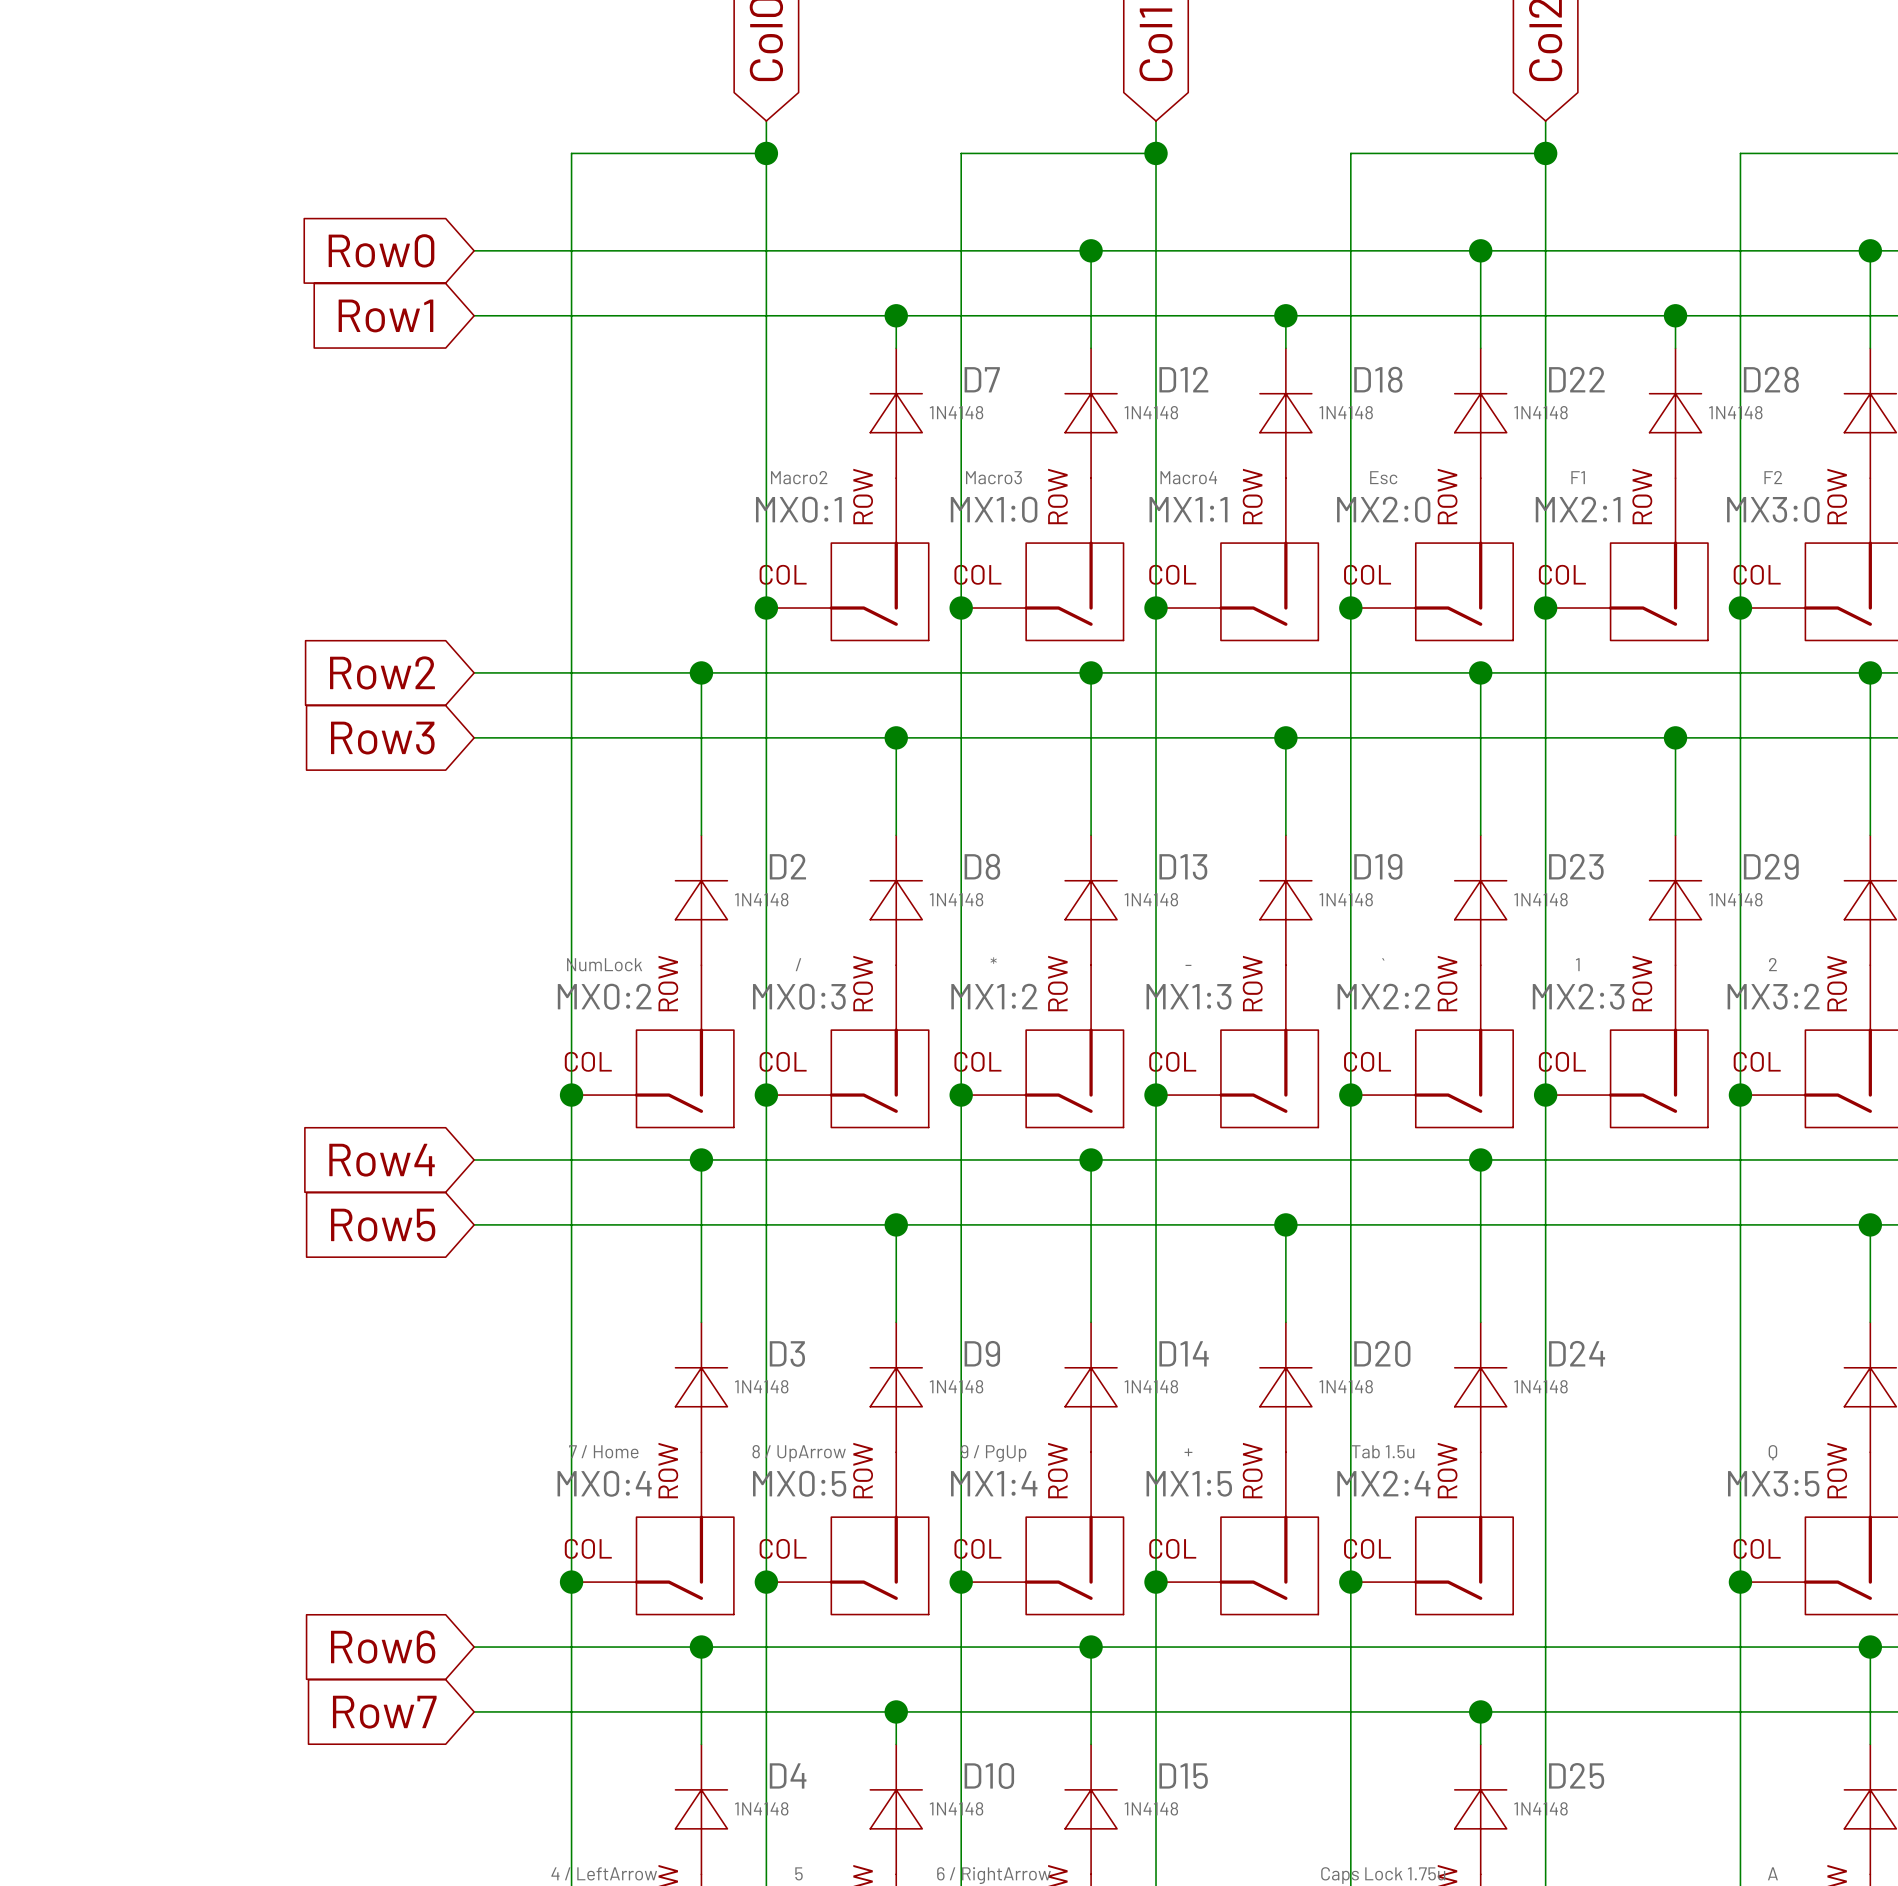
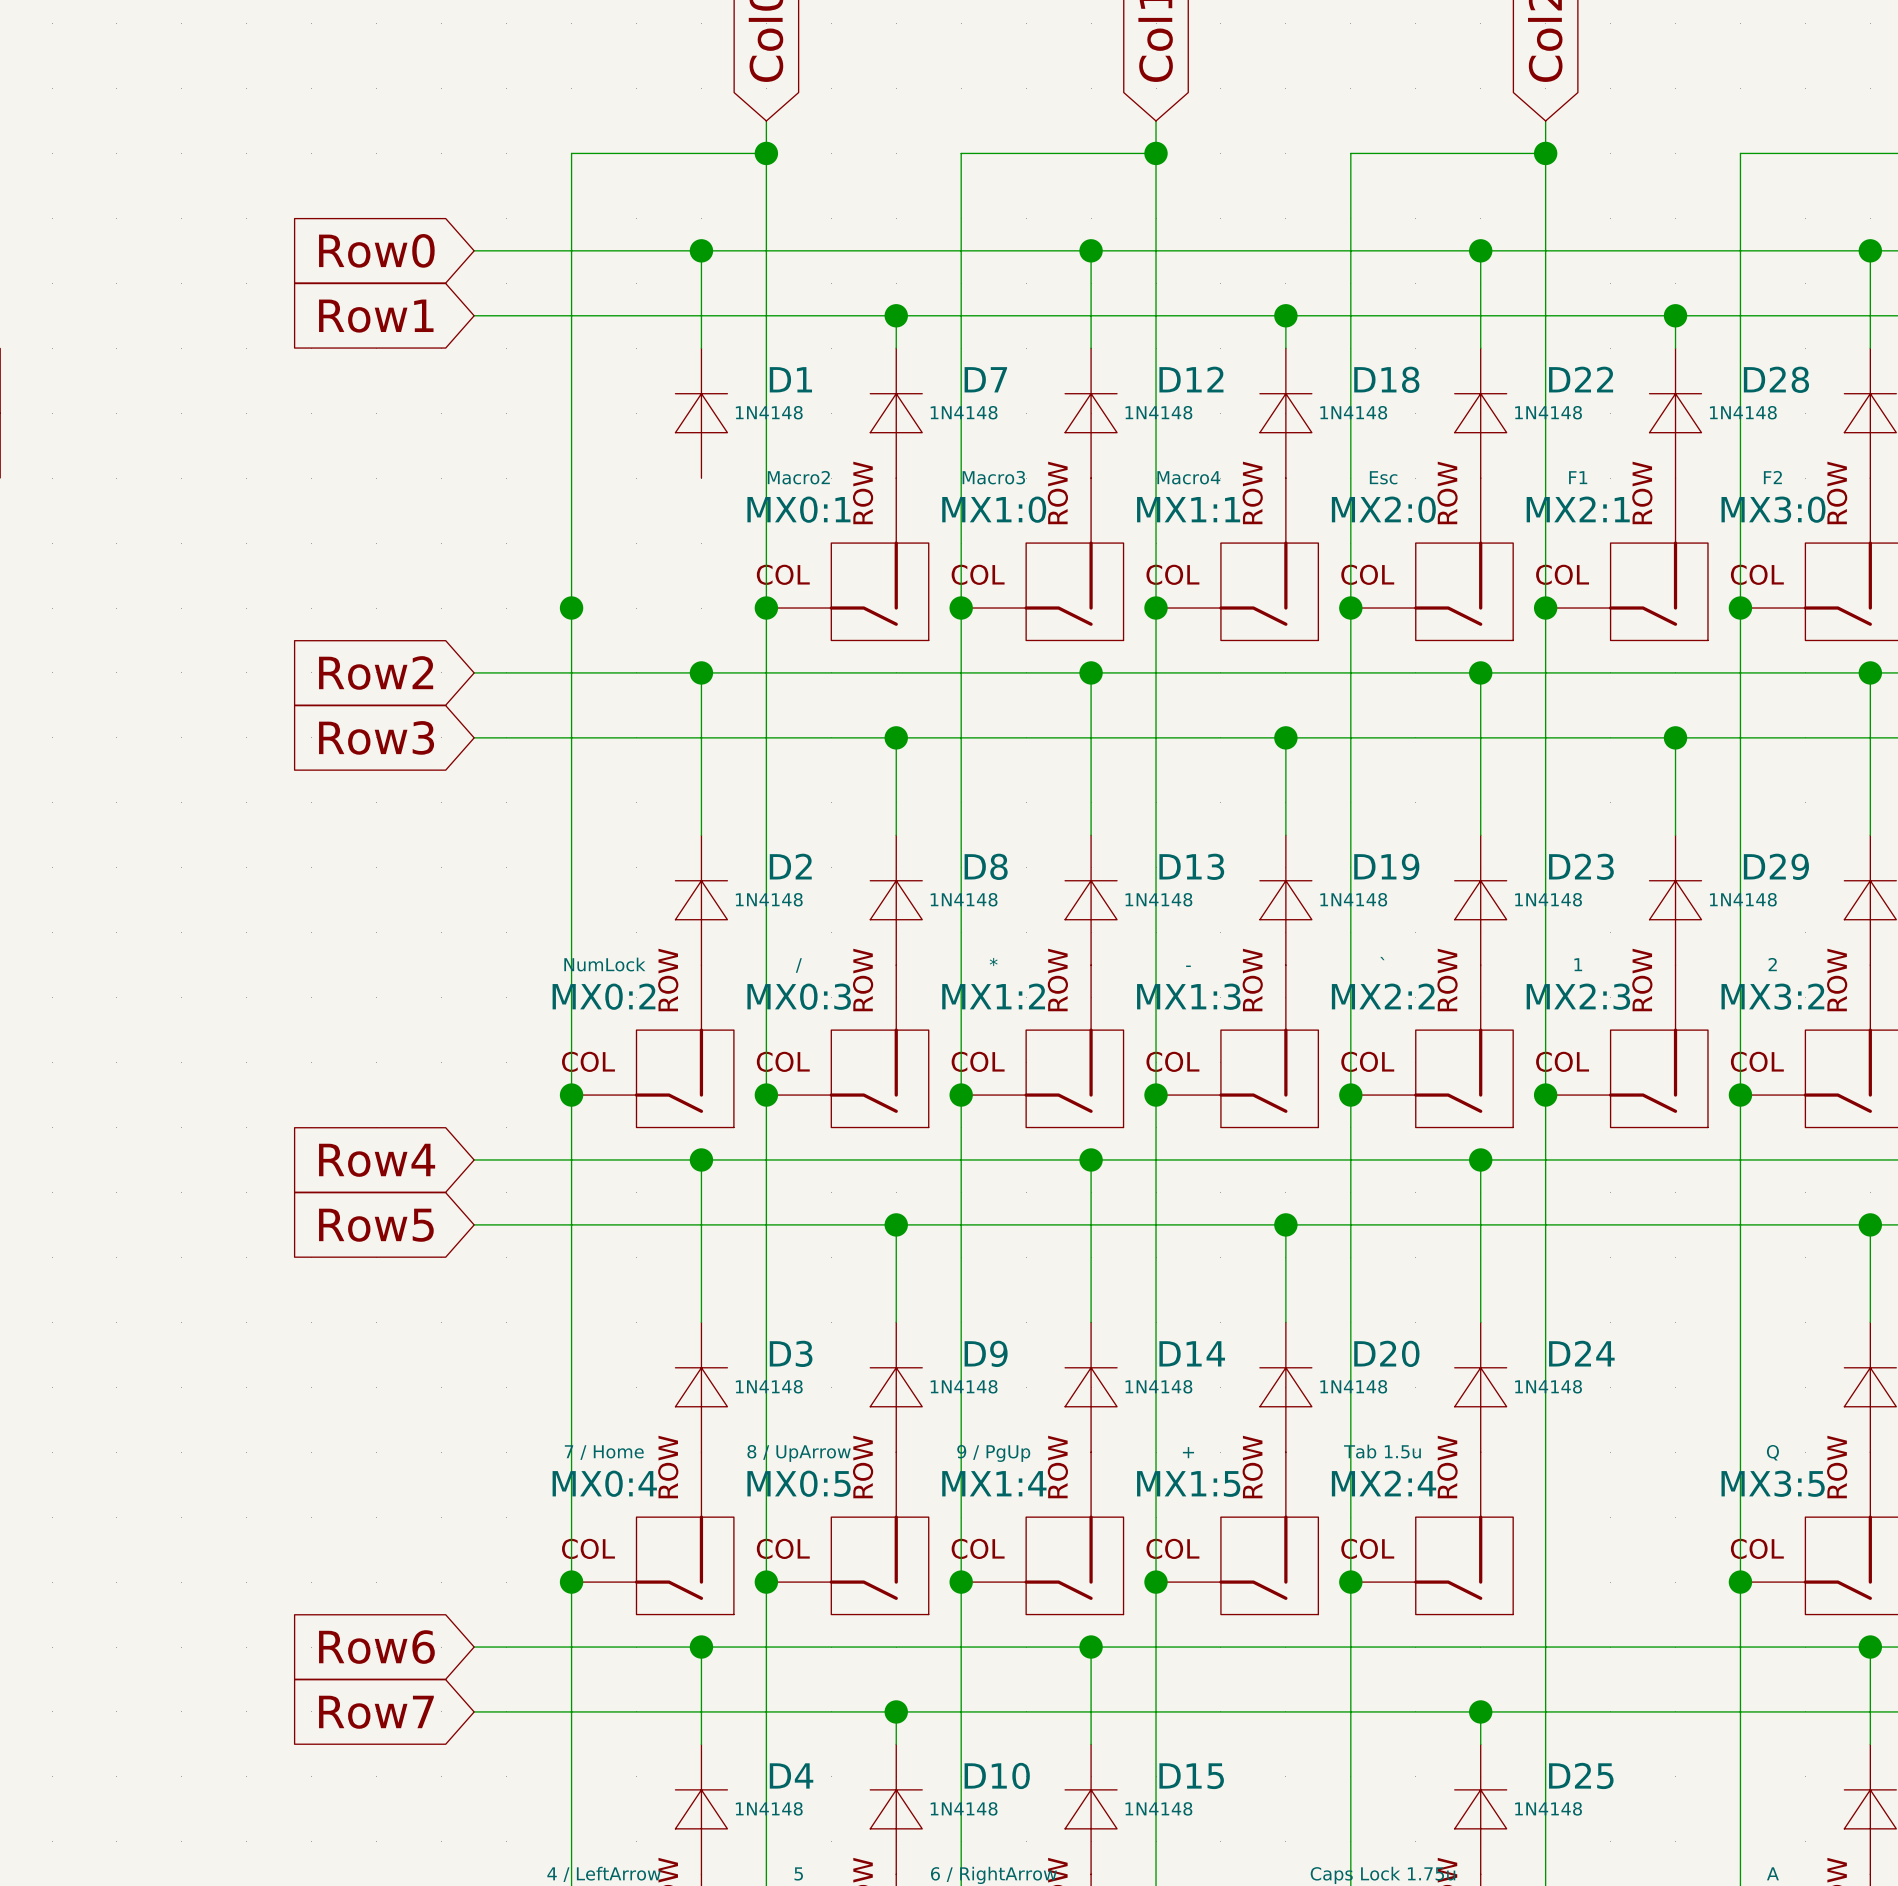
wire: none -> (701, 250) (701, 348)
junction: none -> (701, 250)
D1: none -> 1N4148 (701, 413)
junction: none -> (571, 608)

